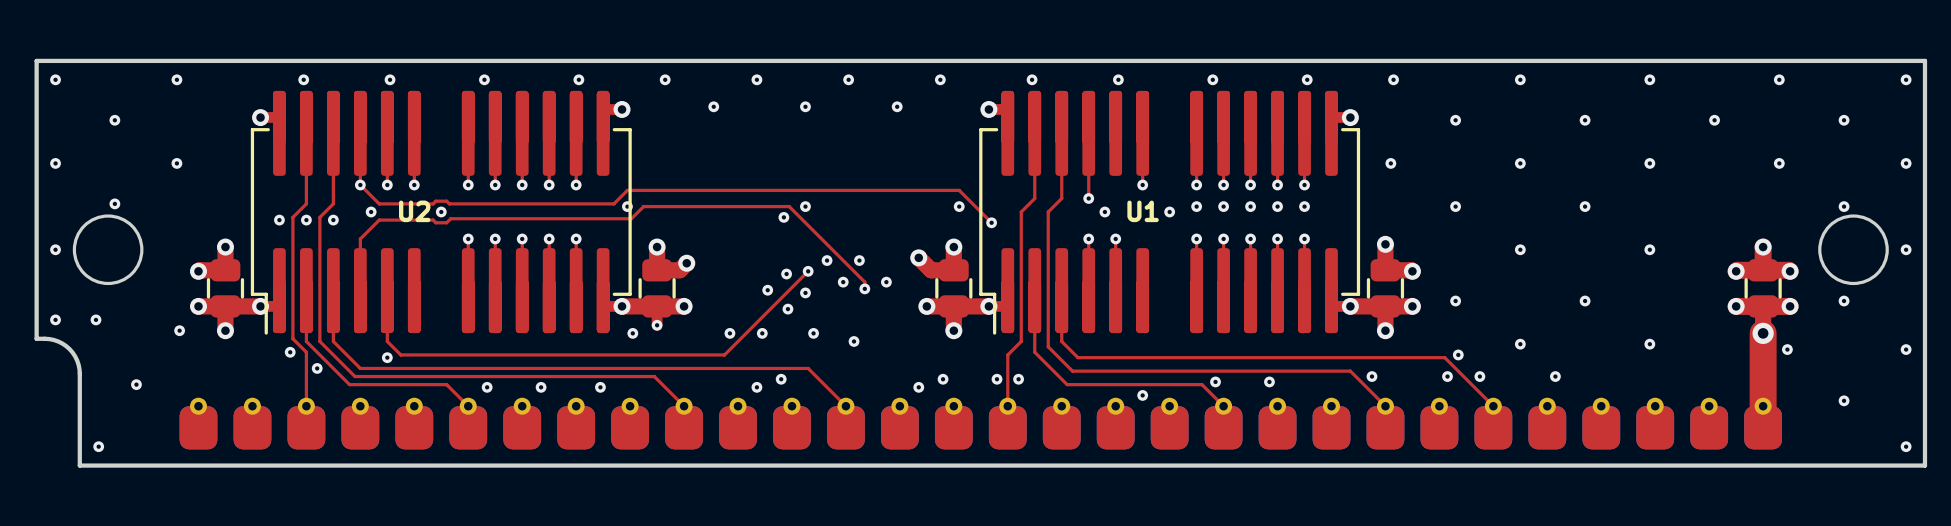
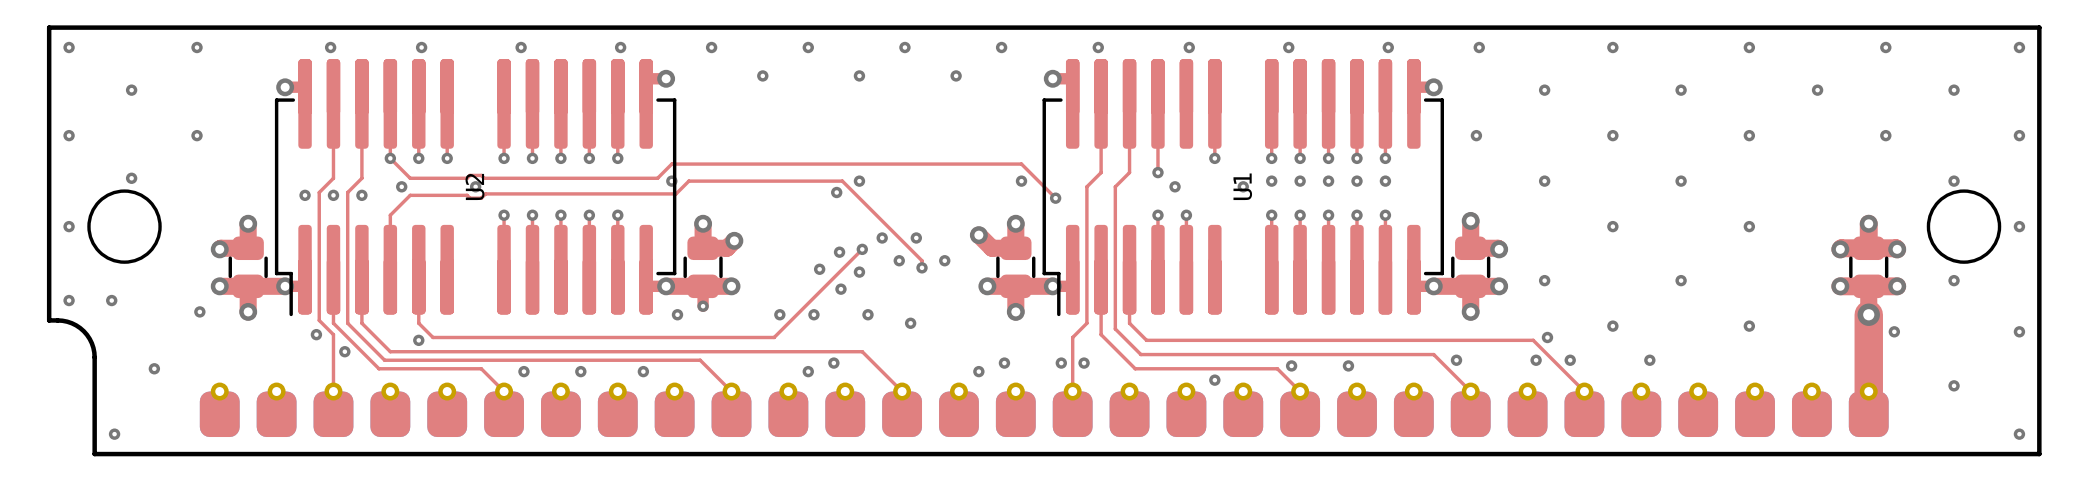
U2 name rotation: 0° (414, 211) -> 90° counterclockwise (474, 186)
U1 name rotation: 0° (1143, 211) -> 90° counterclockwise (1242, 186)

